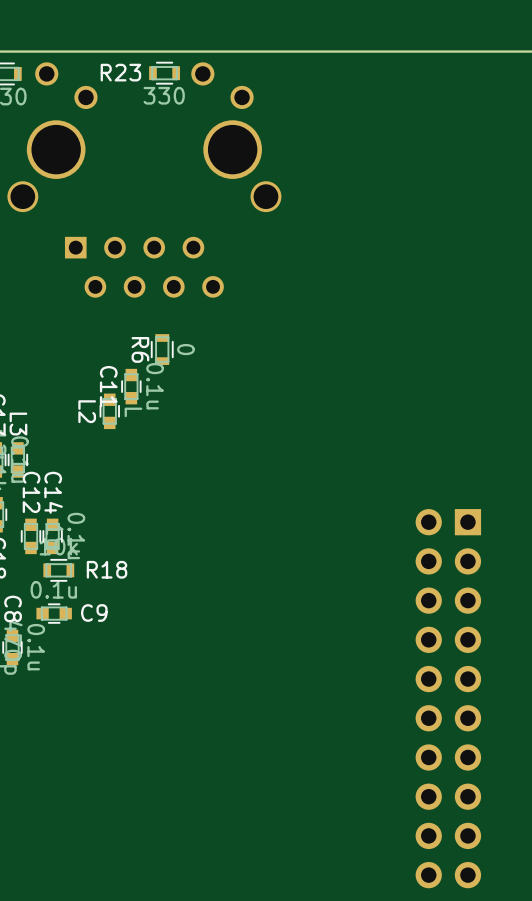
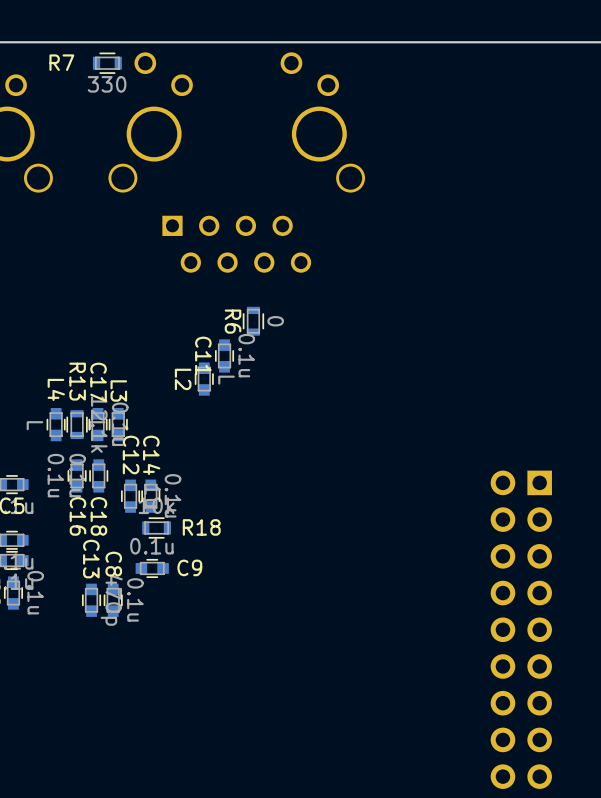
R23: 330 (164, 73) -> none

